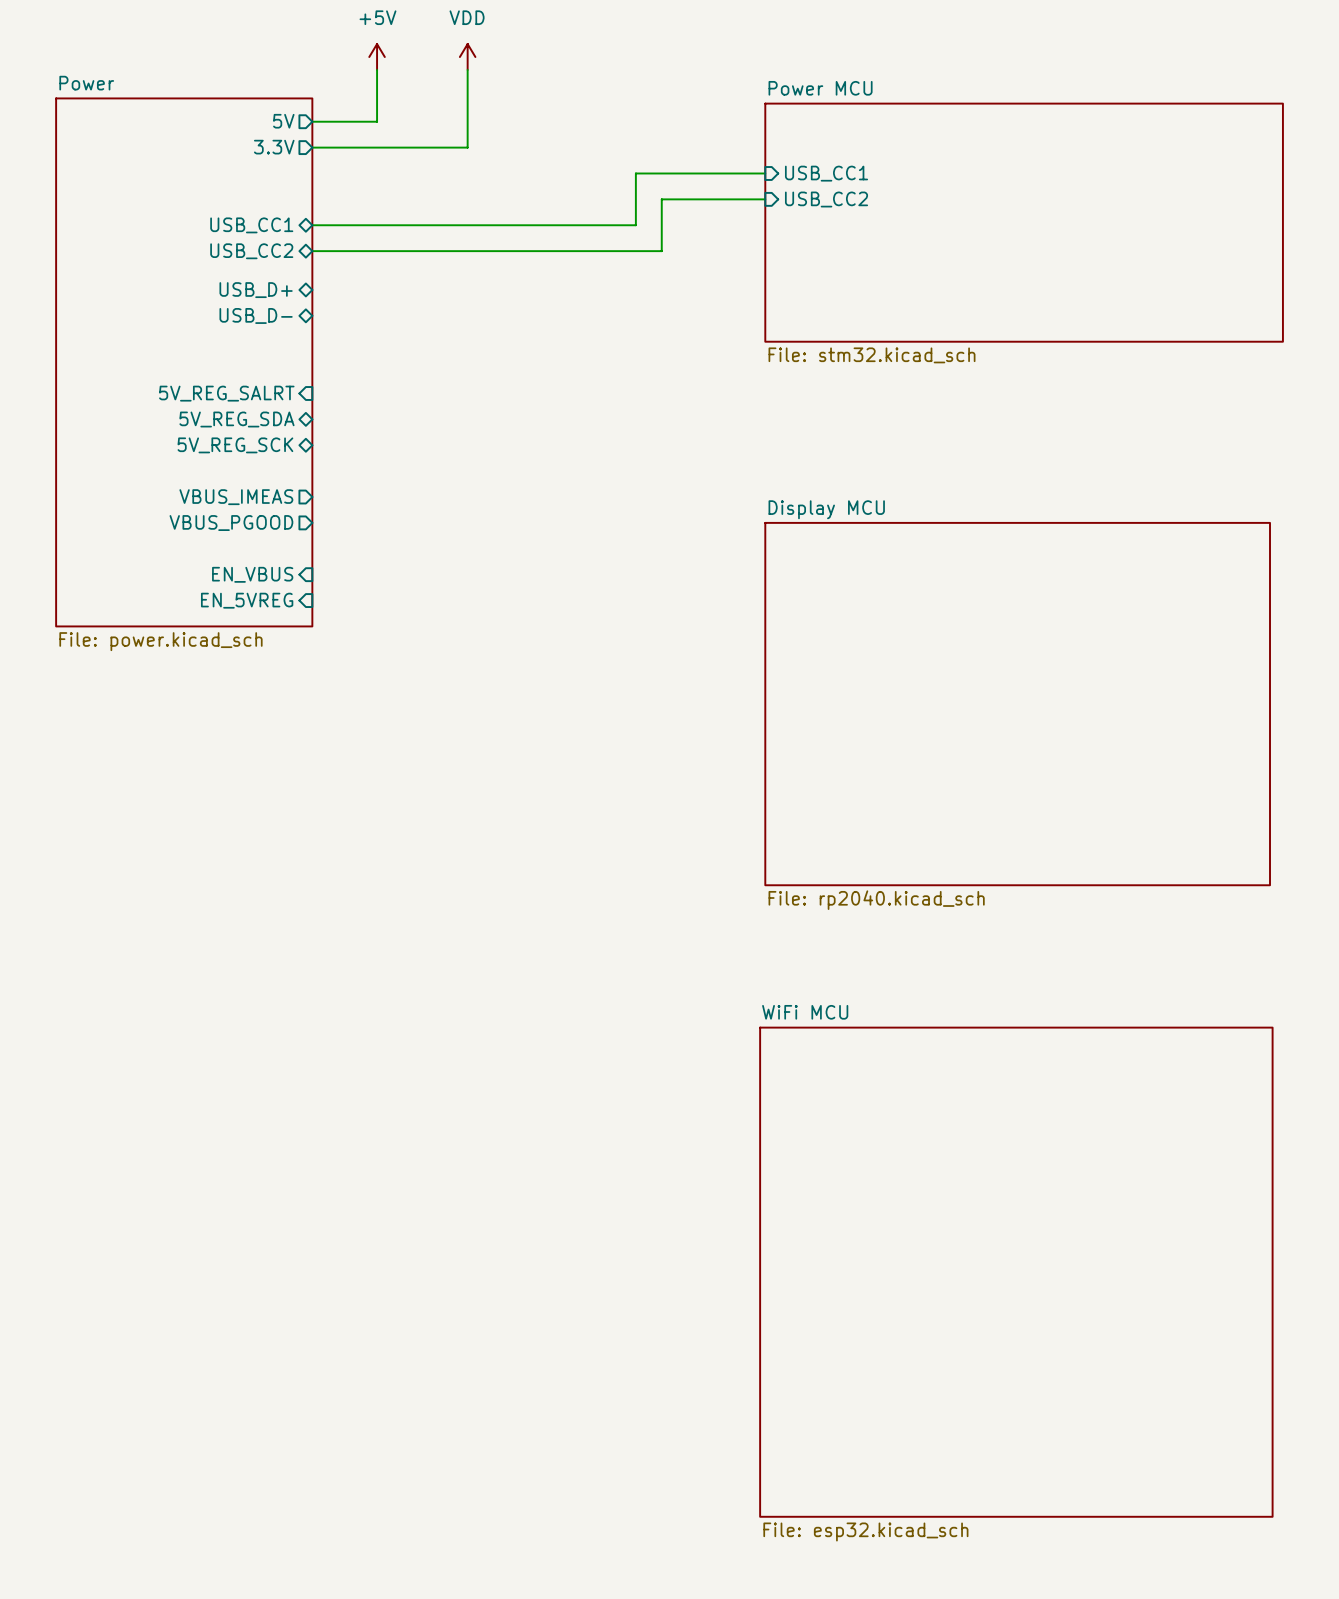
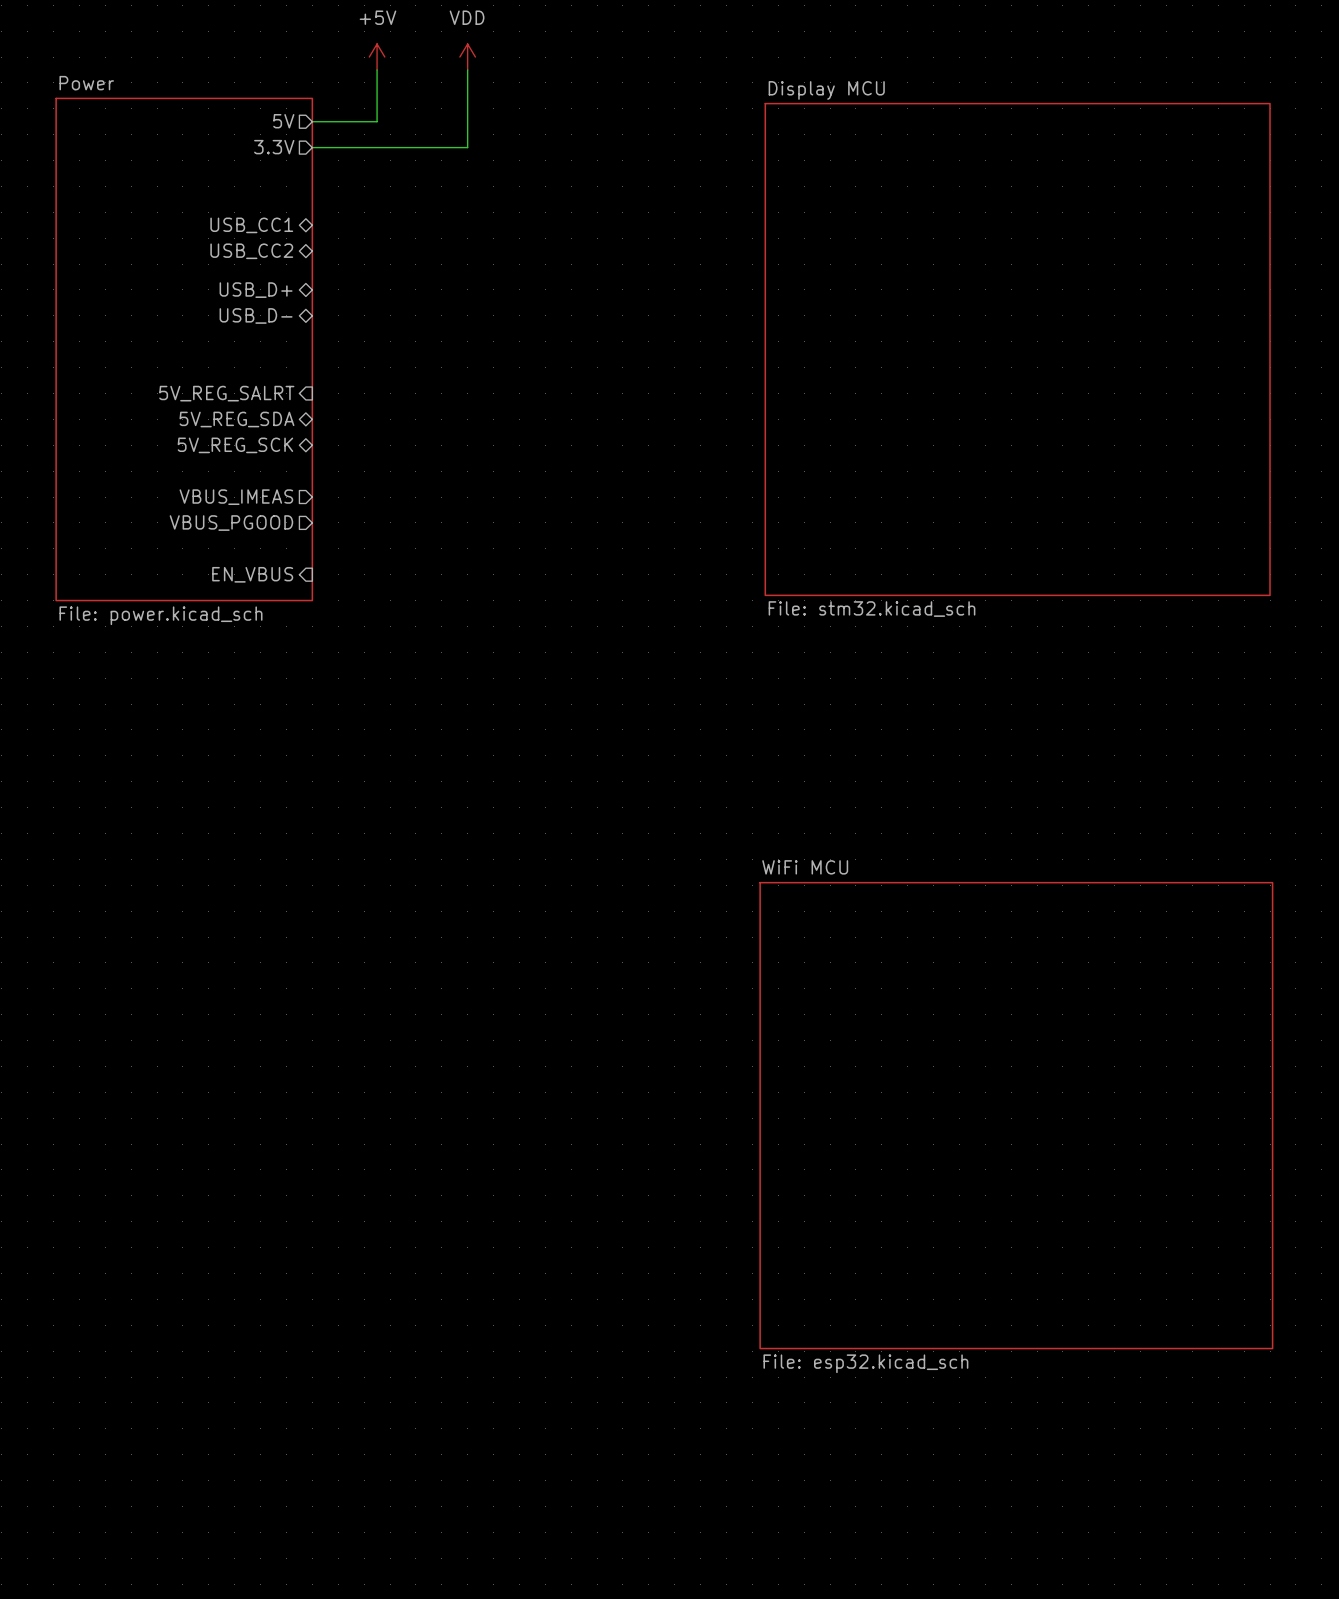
wire: (765, 173) (635, 173) (635, 225) (312, 225) -> none
sheet pin: USB_CC1 (826, 173) -> none
wire: (765, 199) (661, 199) (661, 251) (312, 251) -> none
sheet pin: USB_CC2 (826, 199) -> none
sheet Power MCU: File: stm32.kicad_sch (1024, 222) -> none
sheet Power: none -> File: power.kicad_sch (184, 349)
sheet Display MCU: none -> File: stm32.kicad_sch (1017, 349)
sheet Power: File: power.kicad_sch (184, 362) -> none
sheet pin: EN_5VREG (247, 600) -> none
sheet Display MCU: File: rp2040.kicad_sch (1017, 704) -> none
sheet WiFi MCU: none -> File: esp32.kicad_sch (1016, 1115)
sheet WiFi MCU: File: esp32.kicad_sch (1016, 1272) -> none

